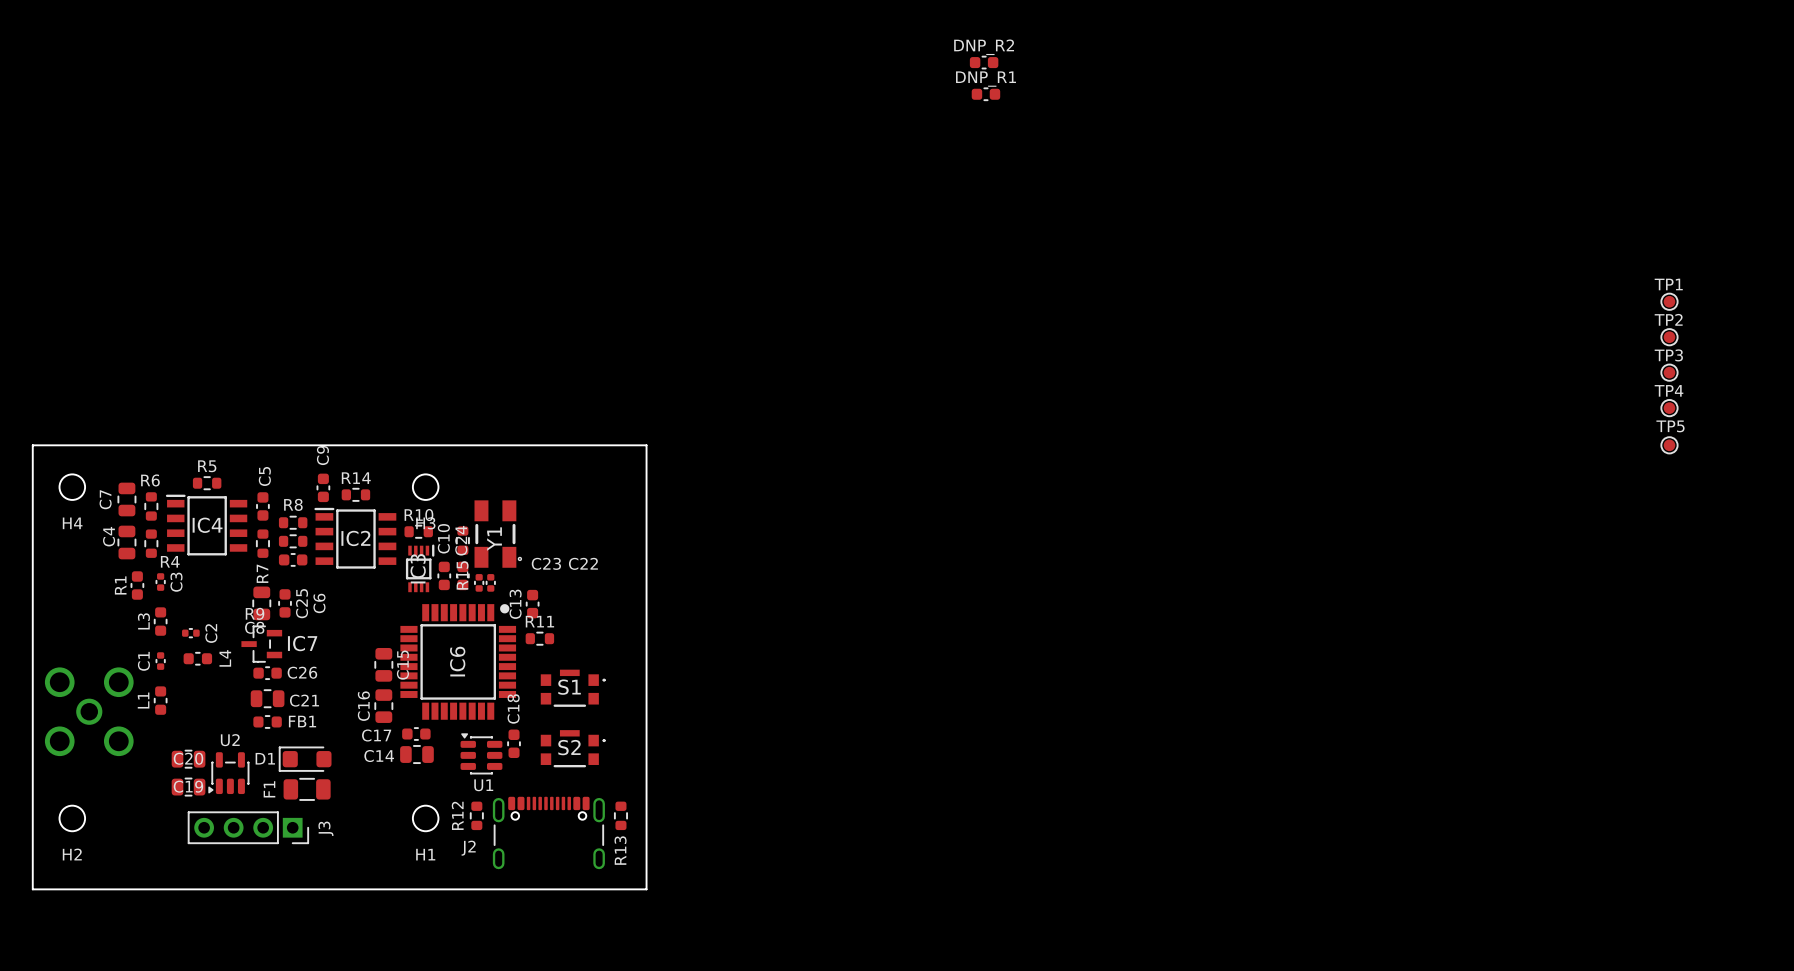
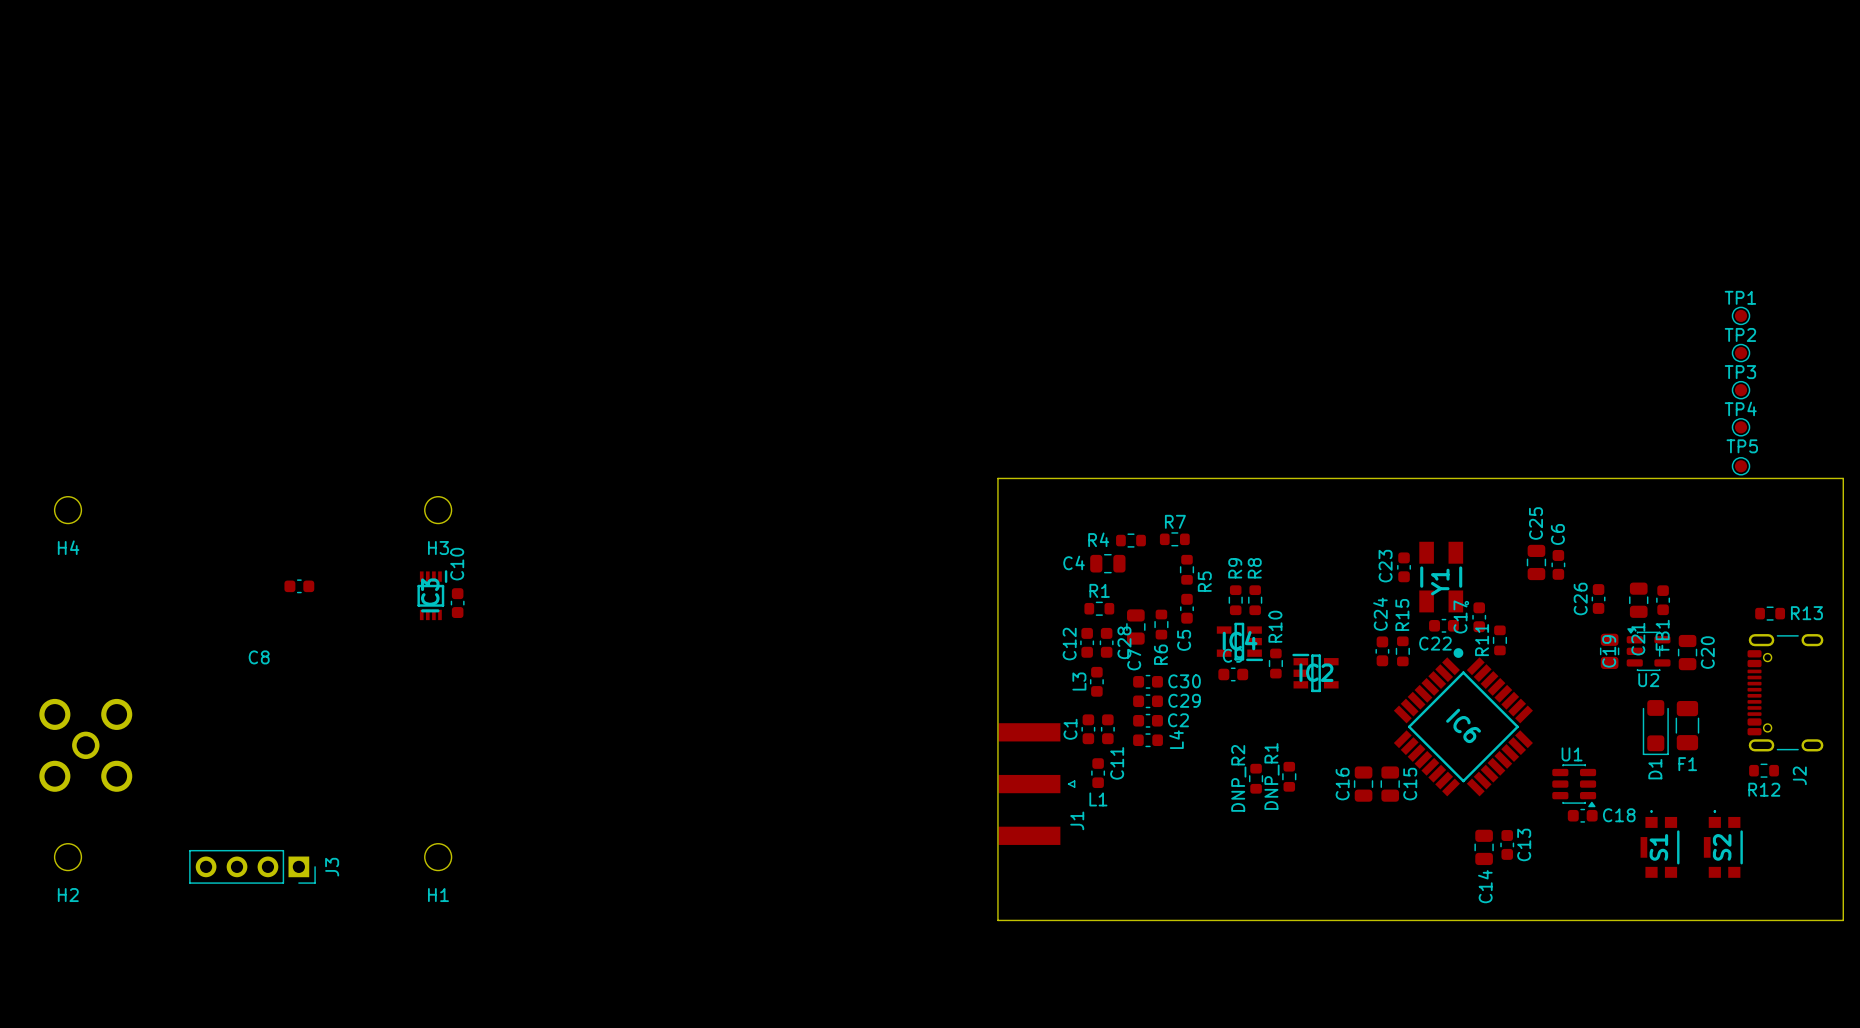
DNP_R2 name position: DNP_R2 (984, 47) -> DNP_R2 (1238, 778)
DNP_R2 footprint: [969, 55, 999, 70] -> [1248, 763, 1264, 794]
DNP_R1 name position: DNP_R1 (986, 79) -> DNP_R1 (1271, 776)
DNP_R1 footprint: [971, 87, 1001, 101] -> [1282, 761, 1297, 792]
board edge: (32, 445) (646, 445) (646, 889) (32, 889) (32, 445) -> none
board edge: none -> (997, 478) (1843, 478) (1843, 920) (997, 920) (997, 478)
C5 name position: C5 (264, 476) -> C5 (1184, 640)
R6 name rotation: 0° (150, 480) -> 90° counterclockwise (1160, 654)
R6 name position: R6 (150, 480) -> R6 (1160, 654)
R5 rotation: 0° (207, 483) -> 90° clockwise (1187, 569)
R5 position: (207, 483) -> (1187, 569)
C9 rotation: 0° (323, 487) -> 90° clockwise (1233, 674)
C9 position: (323, 487) -> (1233, 674)
IC4 footprint: [165, 494, 248, 556] -> [1216, 622, 1264, 662]
R14: (355, 494) -> none
C7 name position: C7 (105, 499) -> C7 (1134, 659)
C7 position: (126, 499) -> (1135, 627)
R6 position: (151, 506) -> (1161, 624)
C5 position: (262, 506) -> (1187, 608)
IC2 footprint: [314, 507, 397, 569] -> [1292, 653, 1339, 693]
R8 rotation: 0° (293, 522) -> 90° clockwise (1255, 600)
R8 position: (293, 522) -> (1255, 600)
R10 rotation: 0° (418, 531) -> 90° clockwise (1275, 663)
R10 position: (418, 531) -> (1275, 663)
Y1 position: (498, 534) -> (1444, 577)
R15 position: (462, 540) -> (1402, 651)
R9 rotation: 0° (293, 541) -> 90° clockwise (1235, 600)
R9 position: (293, 541) -> (1235, 600)
C4 rotation: 0° (126, 542) -> 90° clockwise (1107, 563)
C4 position: (126, 542) -> (1107, 563)
R4 rotation: 0° (151, 543) -> 90° clockwise (1130, 540)
R4 position: (151, 543) -> (1130, 540)
R7 rotation: 0° (262, 543) -> 90° clockwise (1174, 539)
R7 position: (262, 543) -> (1174, 539)
C23 name position: C23 (546, 563) -> C23 (1385, 566)
C22 name position: C22 (583, 563) -> C22 (1435, 643)
R1 footprint: [130, 571, 145, 600] -> [1084, 601, 1115, 616]
R7 name position: R7 (262, 573) -> R7 (1175, 521)
C23 footprint: [474, 574, 485, 592] -> [1397, 552, 1411, 583]
C22 footprint: [485, 574, 496, 592] -> [1429, 618, 1459, 633]
R15 name position: R15 (462, 575) -> R15 (1402, 614)
C24 position: (462, 575) -> (1382, 651)
C3: (160, 582) -> none
C25 position: (261, 603) -> (1536, 562)
C6 position: (285, 603) -> (1558, 564)
C25 name position: C25 (302, 603) -> C25 (1536, 523)
C6 name position: C6 (319, 603) -> C6 (1557, 534)
C13 name position: C13 (515, 604) -> C13 (1524, 844)
C13 position: (532, 604) -> (1507, 844)
R9 name position: R9 (255, 613) -> R9 (1235, 568)
C12: none -> (1087, 642)
C28: none -> (1106, 642)
L3 position: (160, 621) -> (1096, 681)
R11 name position: R11 (539, 621) -> R11 (1482, 640)
C2 footprint: [182, 628, 200, 639] -> [1133, 713, 1163, 728]
R11 rotation: 0° (539, 638) -> 90° clockwise (1499, 640)
R11 position: (539, 638) -> (1499, 640)
IC7: (261, 644) -> none
C30: none -> (1148, 681)
C1 footprint: [155, 652, 166, 670] -> [1081, 714, 1096, 745]
L4 position: (197, 658) -> (1148, 740)
IC6 rotation: 0° (458, 661) -> 45° counterclockwise (1463, 722)
IC6 position: (458, 661) -> (1463, 722)
C15 position: (383, 664) -> (1390, 784)
C29: none -> (1148, 701)
C26 name position: C26 (302, 672) -> C26 (1580, 599)
C26 rotation: 0° (267, 673) -> 90° clockwise (1598, 599)
C26 position: (267, 673) -> (1598, 599)
S1 rotation: 0° (573, 688) -> 90° counterclockwise (1660, 844)
S1 position: (573, 688) -> (1660, 844)
C11: none -> (1107, 729)
C21 rotation: 0° (267, 698) -> 90° clockwise (1638, 600)
C21 position: (267, 698) -> (1638, 600)
L1 name rotation: 0° (143, 700) -> 90° clockwise (1098, 799)
L1 name position: L1 (143, 700) -> L1 (1098, 799)
L1 position: (160, 700) -> (1098, 773)
C16 position: (383, 706) -> (1363, 784)
FB1 rotation: 0° (267, 721) -> 90° clockwise (1663, 600)
FB1 position: (267, 721) -> (1663, 600)
C17 rotation: 0° (416, 734) -> 90° clockwise (1479, 617)
C17 position: (416, 734) -> (1479, 617)
U2 name position: U2 (230, 740) -> U2 (1648, 680)
C18 rotation: 0° (514, 743) -> 90° clockwise (1582, 815)
C18 position: (514, 743) -> (1582, 815)
S2 rotation: 0° (573, 748) -> 90° counterclockwise (1723, 844)
S2 position: (573, 748) -> (1723, 844)
J1: none -> (1036, 784)
U1 rotation: 0° (481, 753) -> 180° (1574, 785)
U1 position: (481, 753) -> (1574, 785)
C14 rotation: 0° (416, 754) -> 90° clockwise (1484, 847)
C14 position: (416, 754) -> (1484, 847)
C14 name position: C14 (379, 756) -> C14 (1485, 886)
C20 rotation: 0° (188, 759) -> 90° clockwise (1687, 652)
C20 position: (188, 759) -> (1687, 652)
D1 rotation: 0° (305, 759) -> 90° counterclockwise (1655, 727)
D1 position: (305, 759) -> (1655, 727)
U2 rotation: 0° (228, 773) -> 90° clockwise (1648, 649)
U2 position: (228, 773) -> (1648, 649)
C19 rotation: 0° (188, 787) -> 90° clockwise (1609, 651)
C19 position: (188, 787) -> (1609, 651)
F1 name position: F1 (269, 789) -> F1 (1687, 764)
F1 rotation: 0° (307, 789) -> 90° clockwise (1687, 725)
F1 position: (307, 789) -> (1687, 725)
R12 name position: R12 (457, 815) -> R12 (1764, 789)
R12 rotation: 0° (476, 815) -> 90° clockwise (1764, 770)
R12 position: (476, 815) -> (1764, 770)
R13 rotation: 0° (620, 815) -> 90° clockwise (1770, 613)
R13 position: (620, 815) -> (1770, 613)
J2 rotation: 0° (548, 832) -> 90° counterclockwise (1785, 692)
J2 position: (548, 832) -> (1785, 692)
R13 name position: R13 (620, 850) -> R13 (1806, 613)

